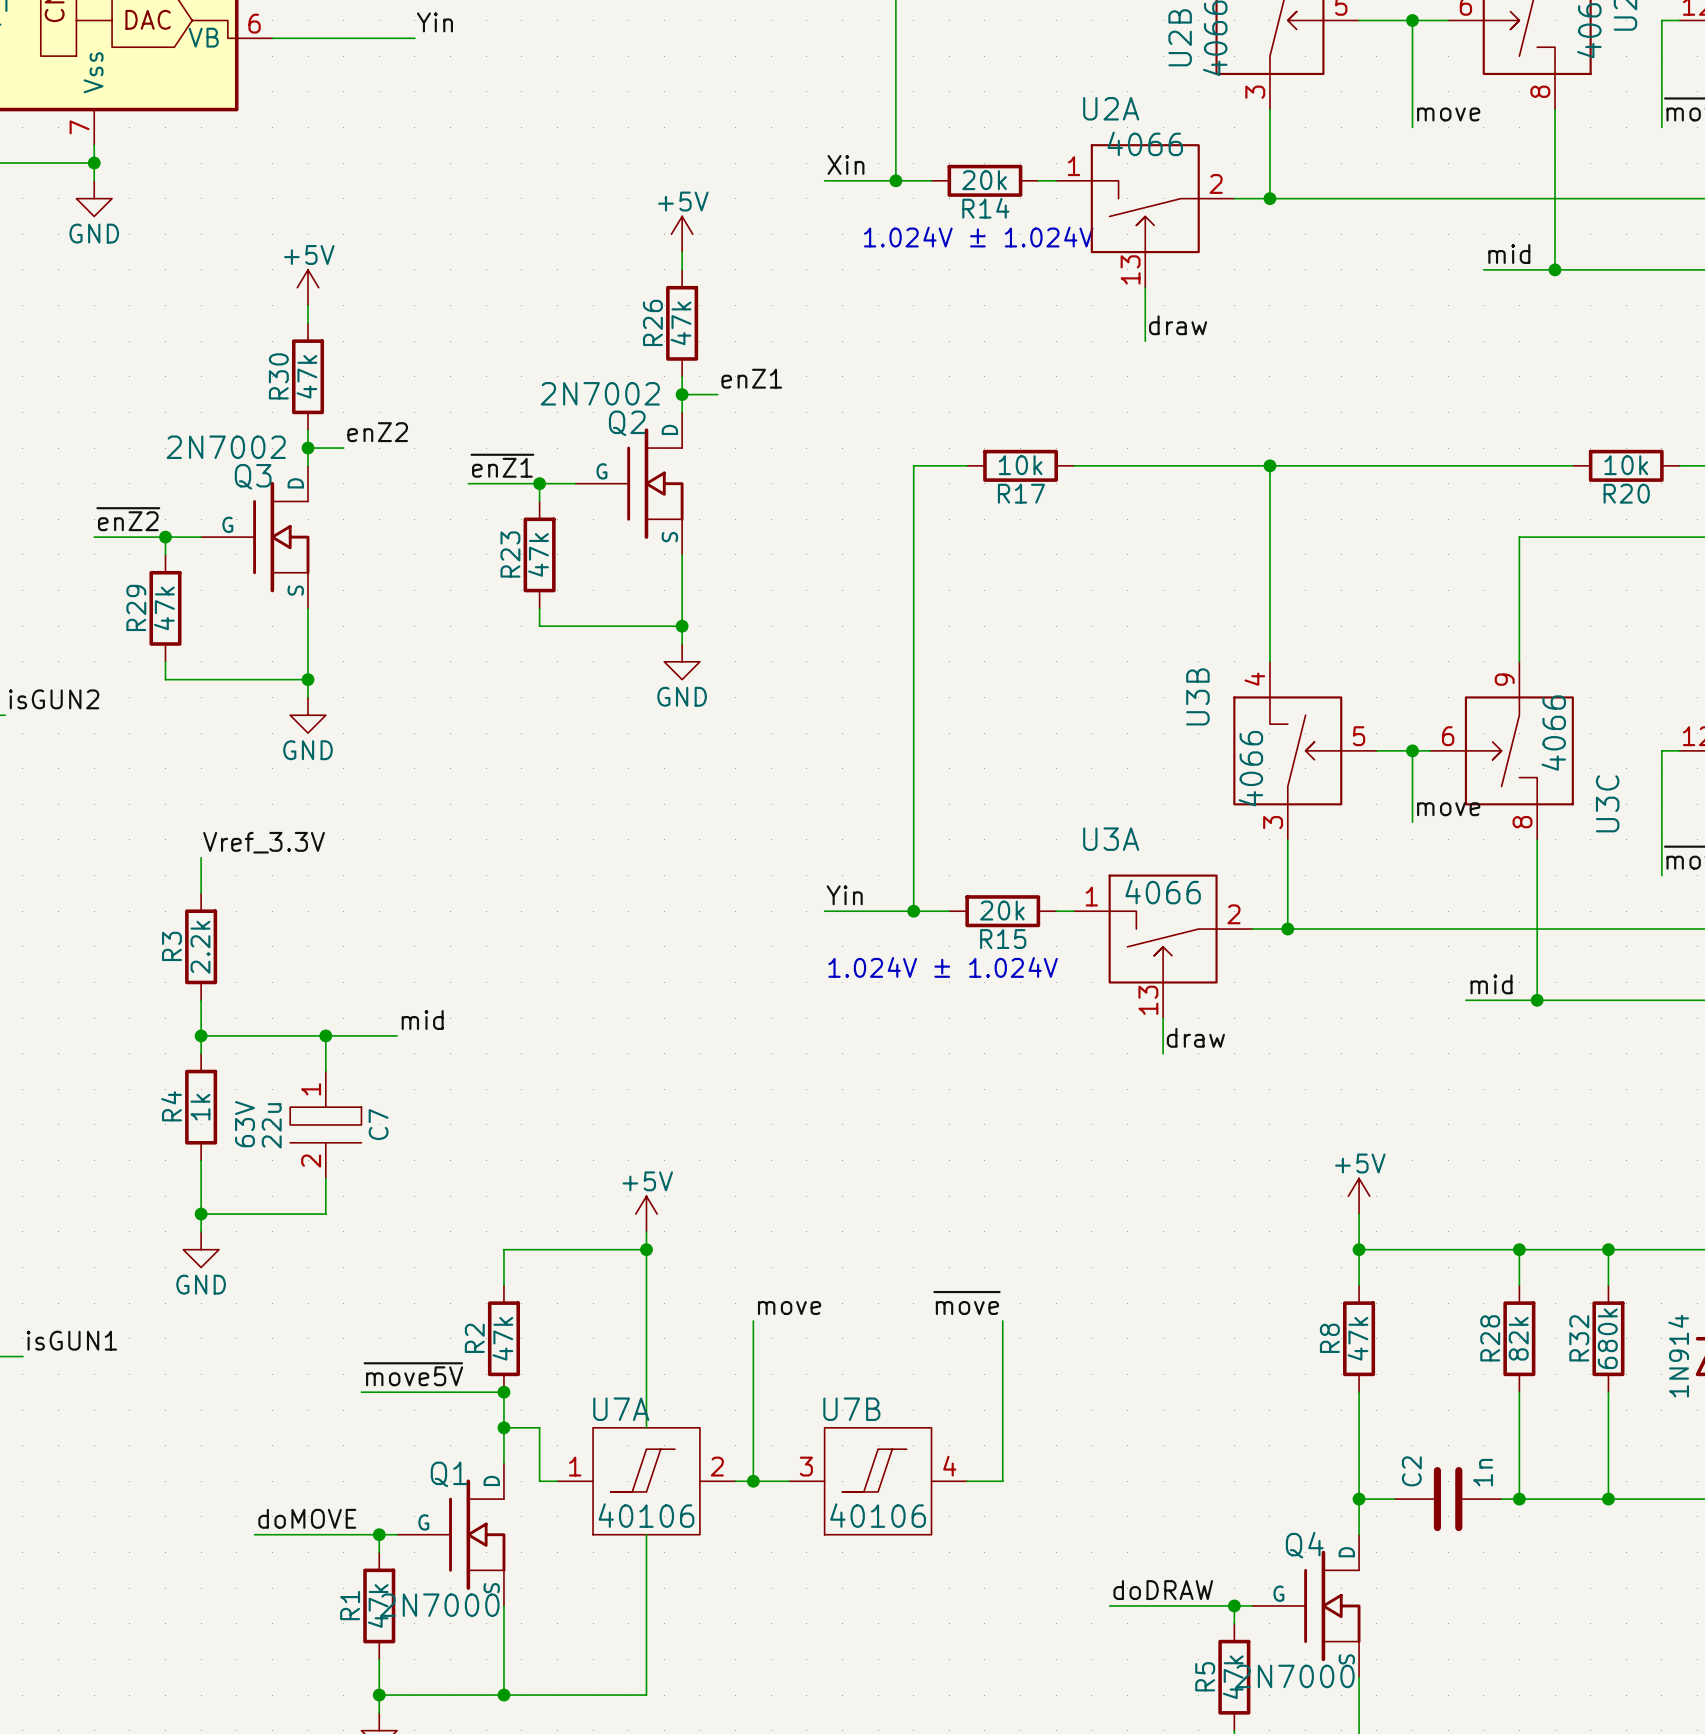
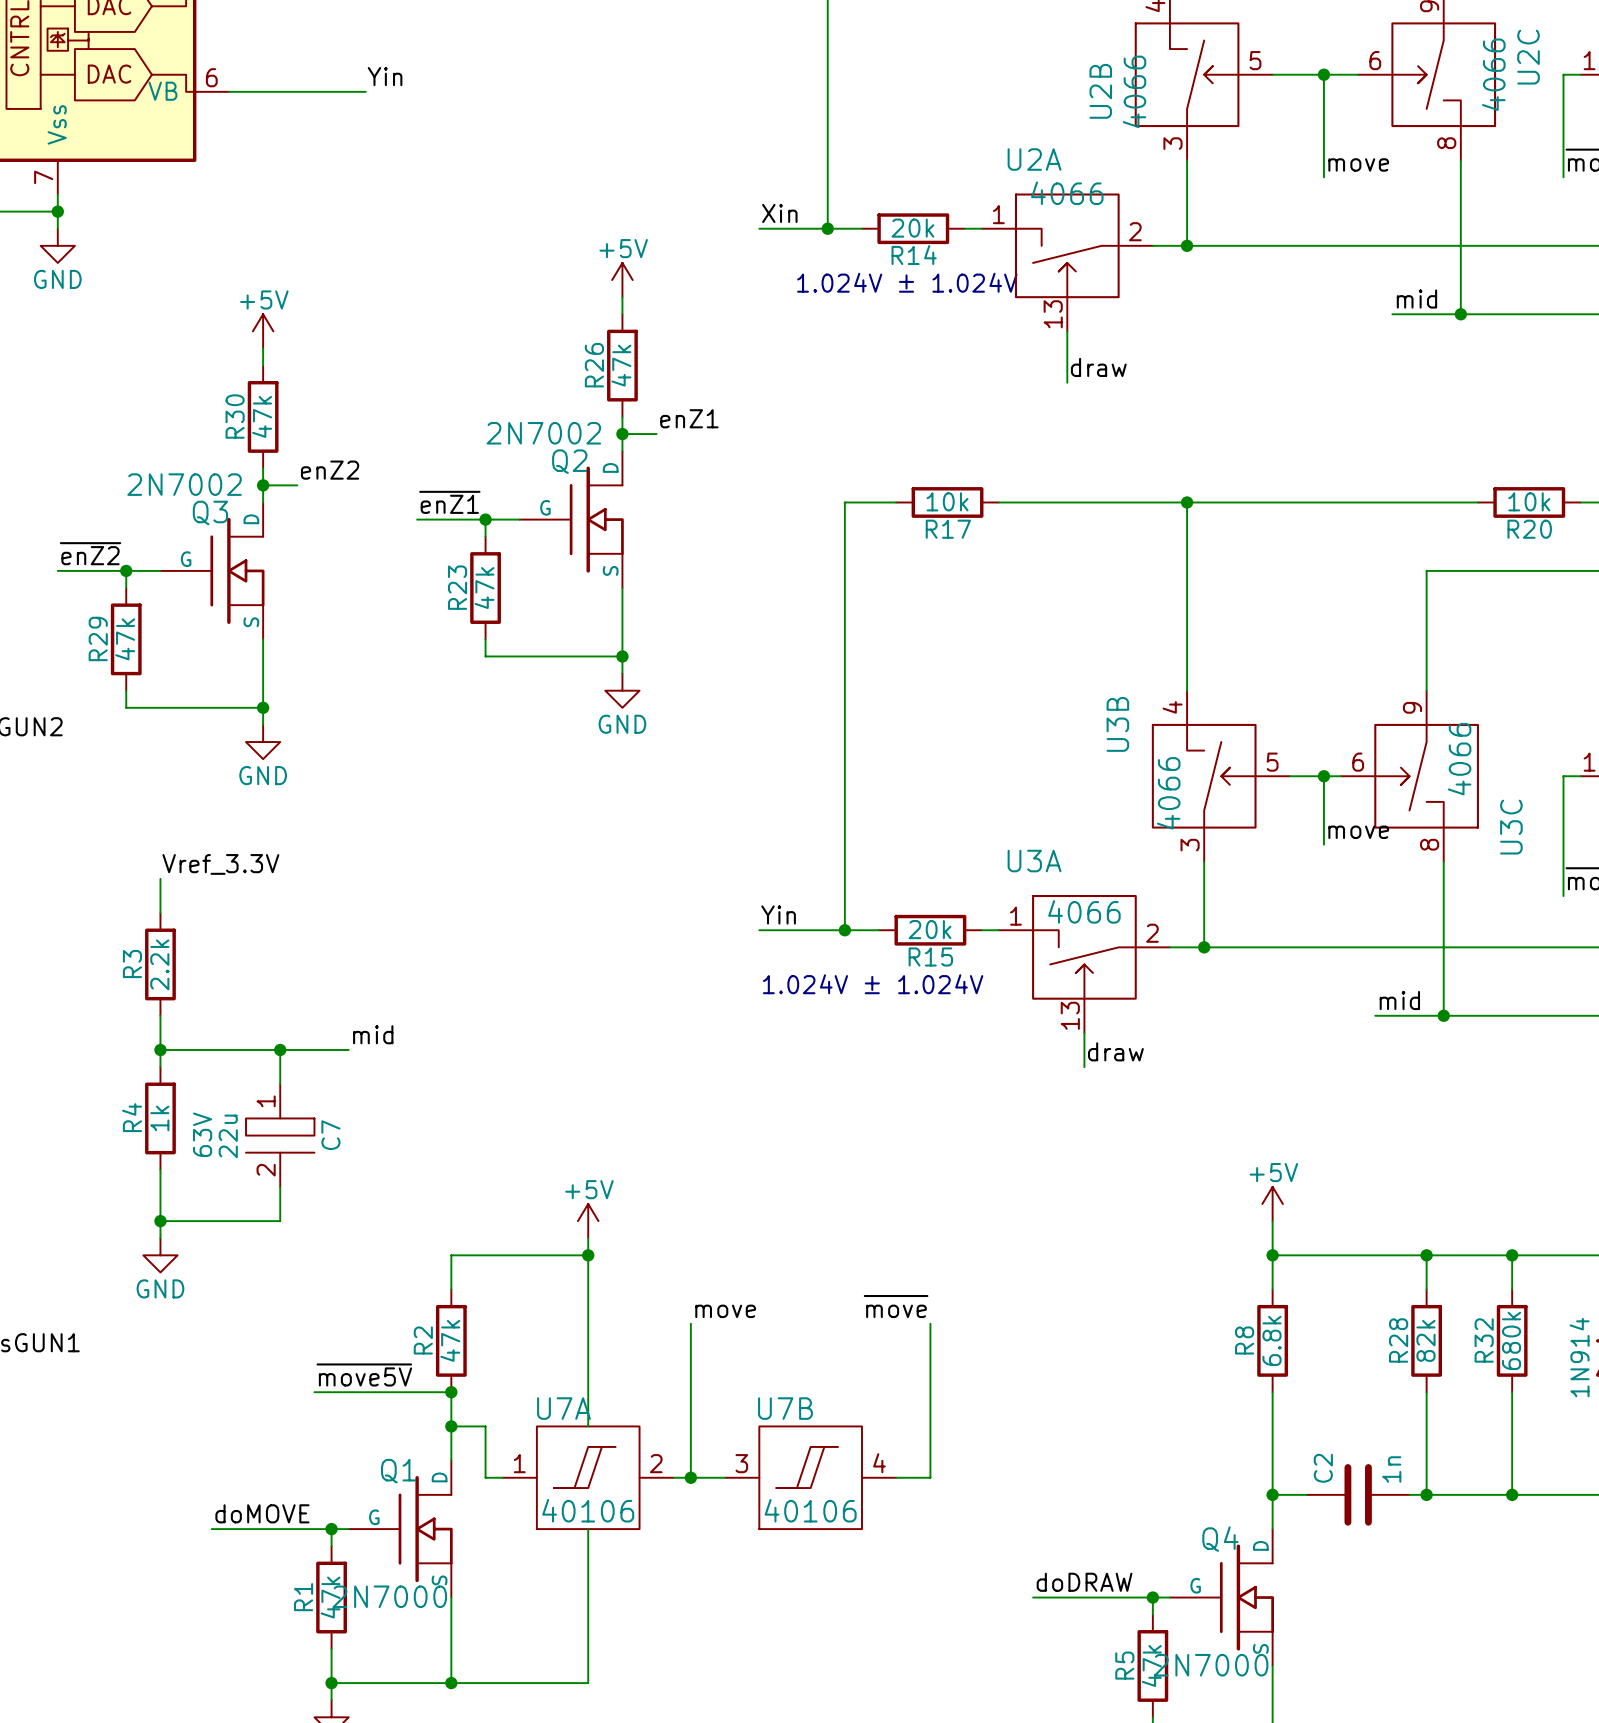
R8 value: 47k (1357, 1338) -> 6.8k (1271, 1340)

